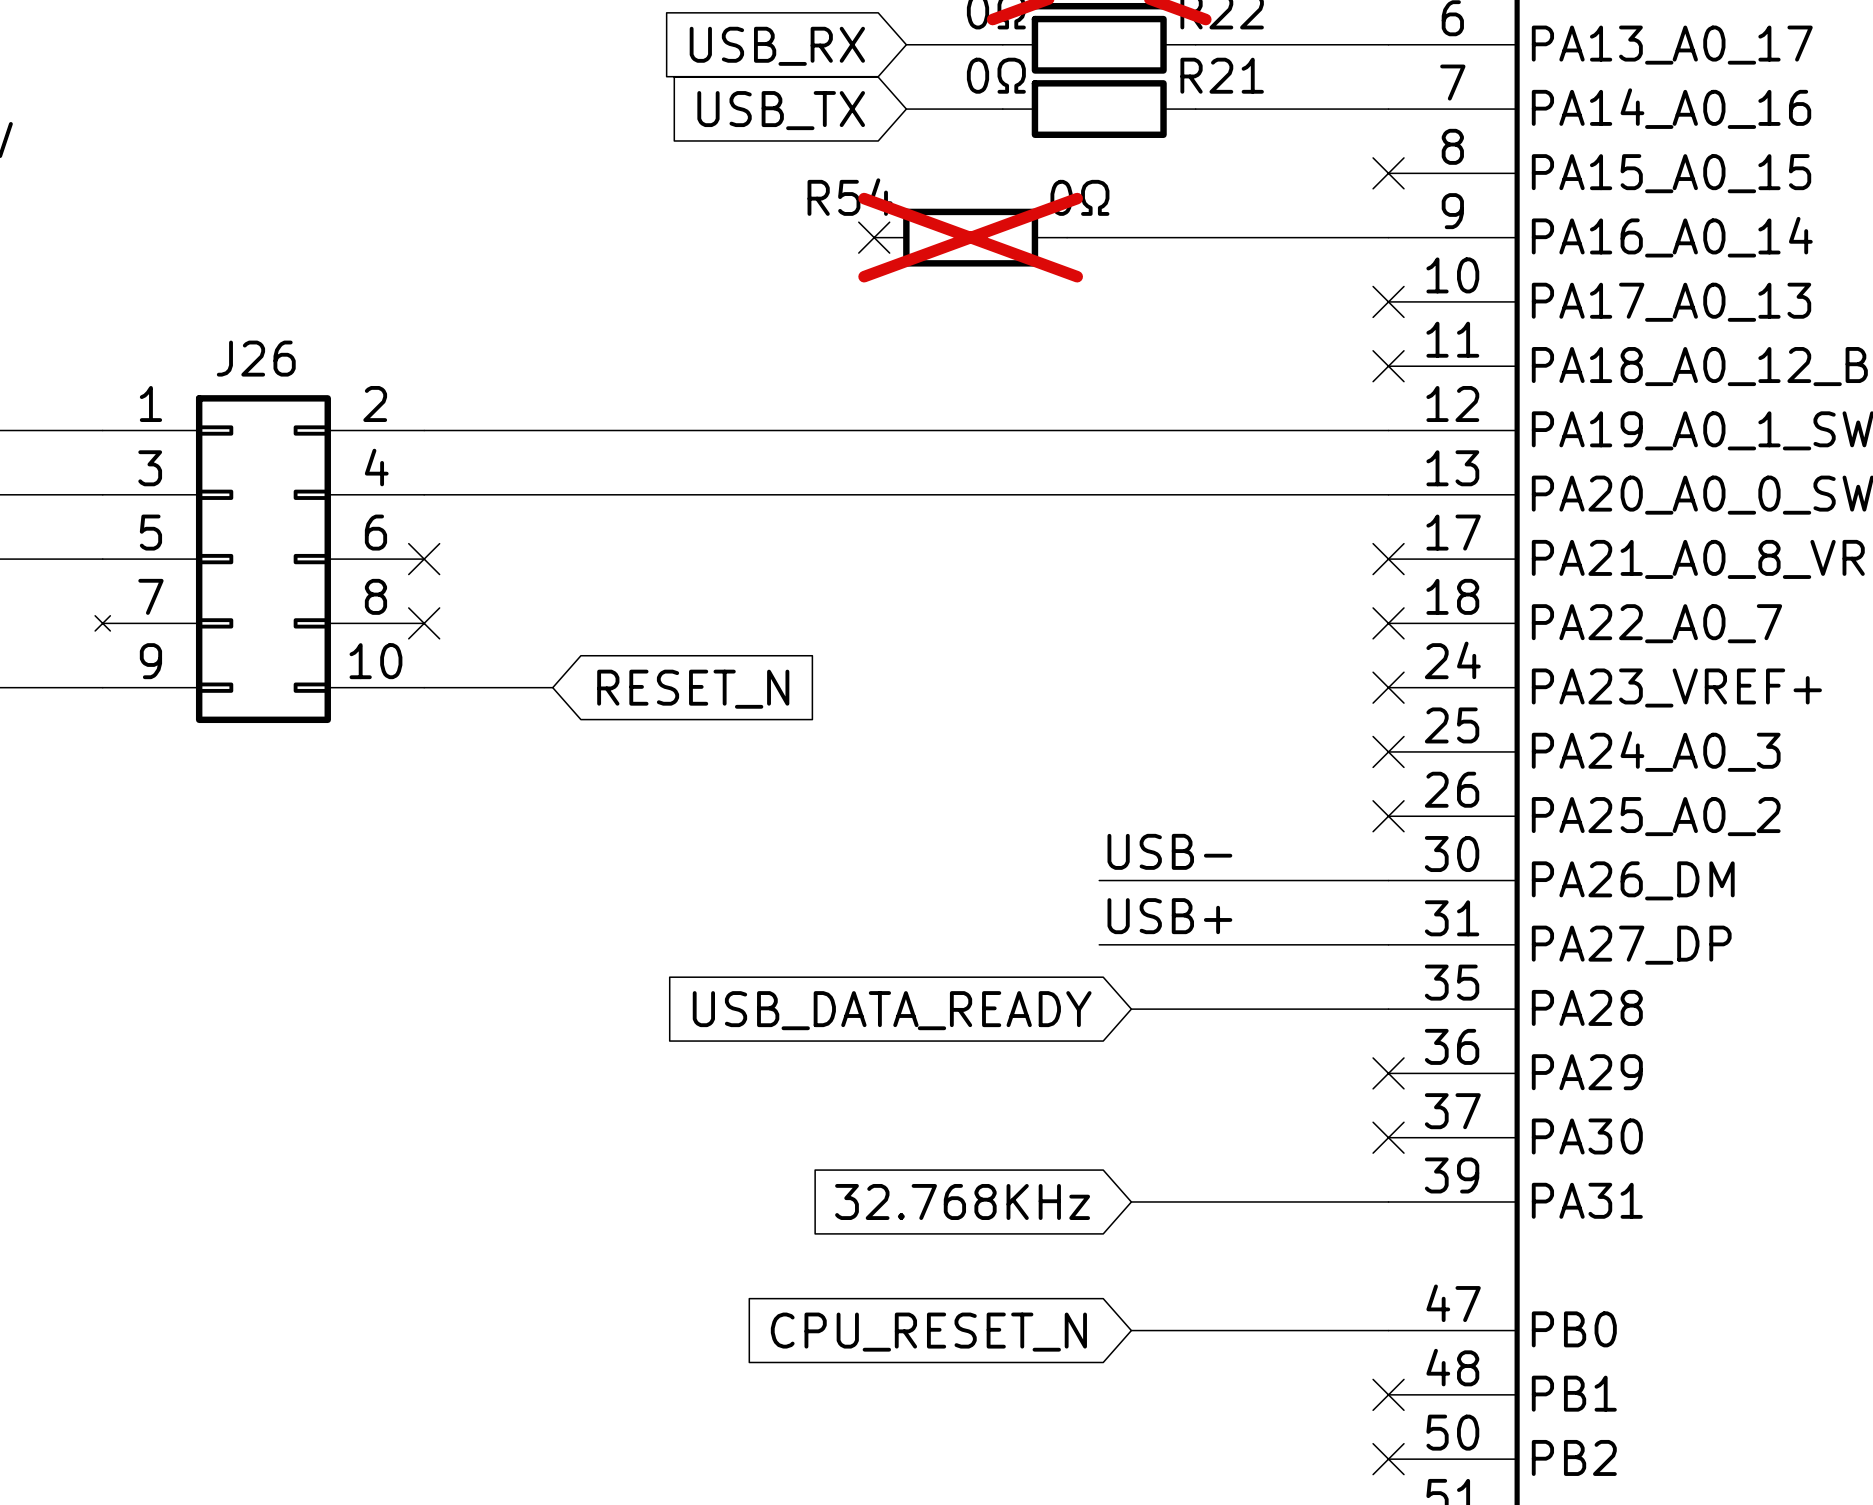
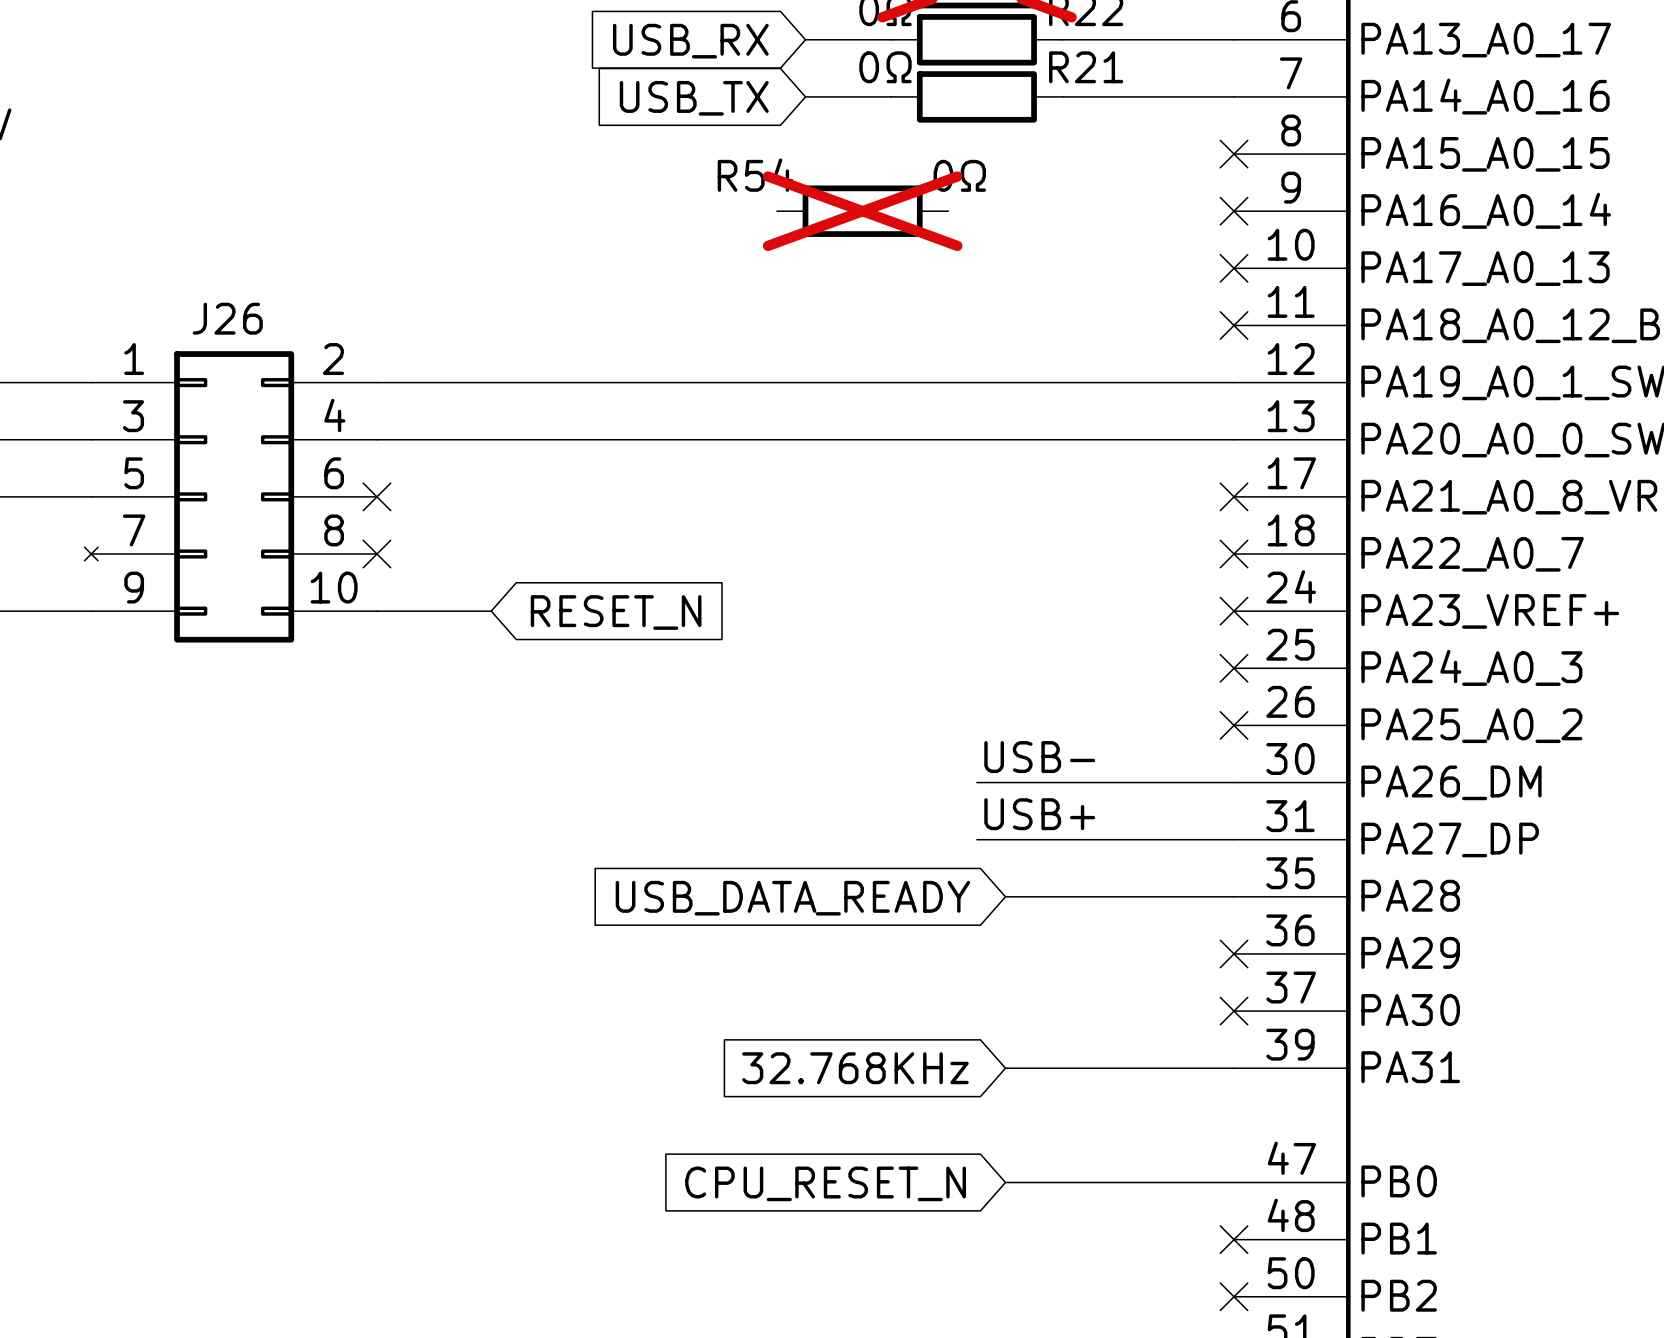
no-connect mark: (874, 237) -> none
wire: (1067, 237) (1388, 237) -> none
no-connect mark: none -> (1234, 211)

